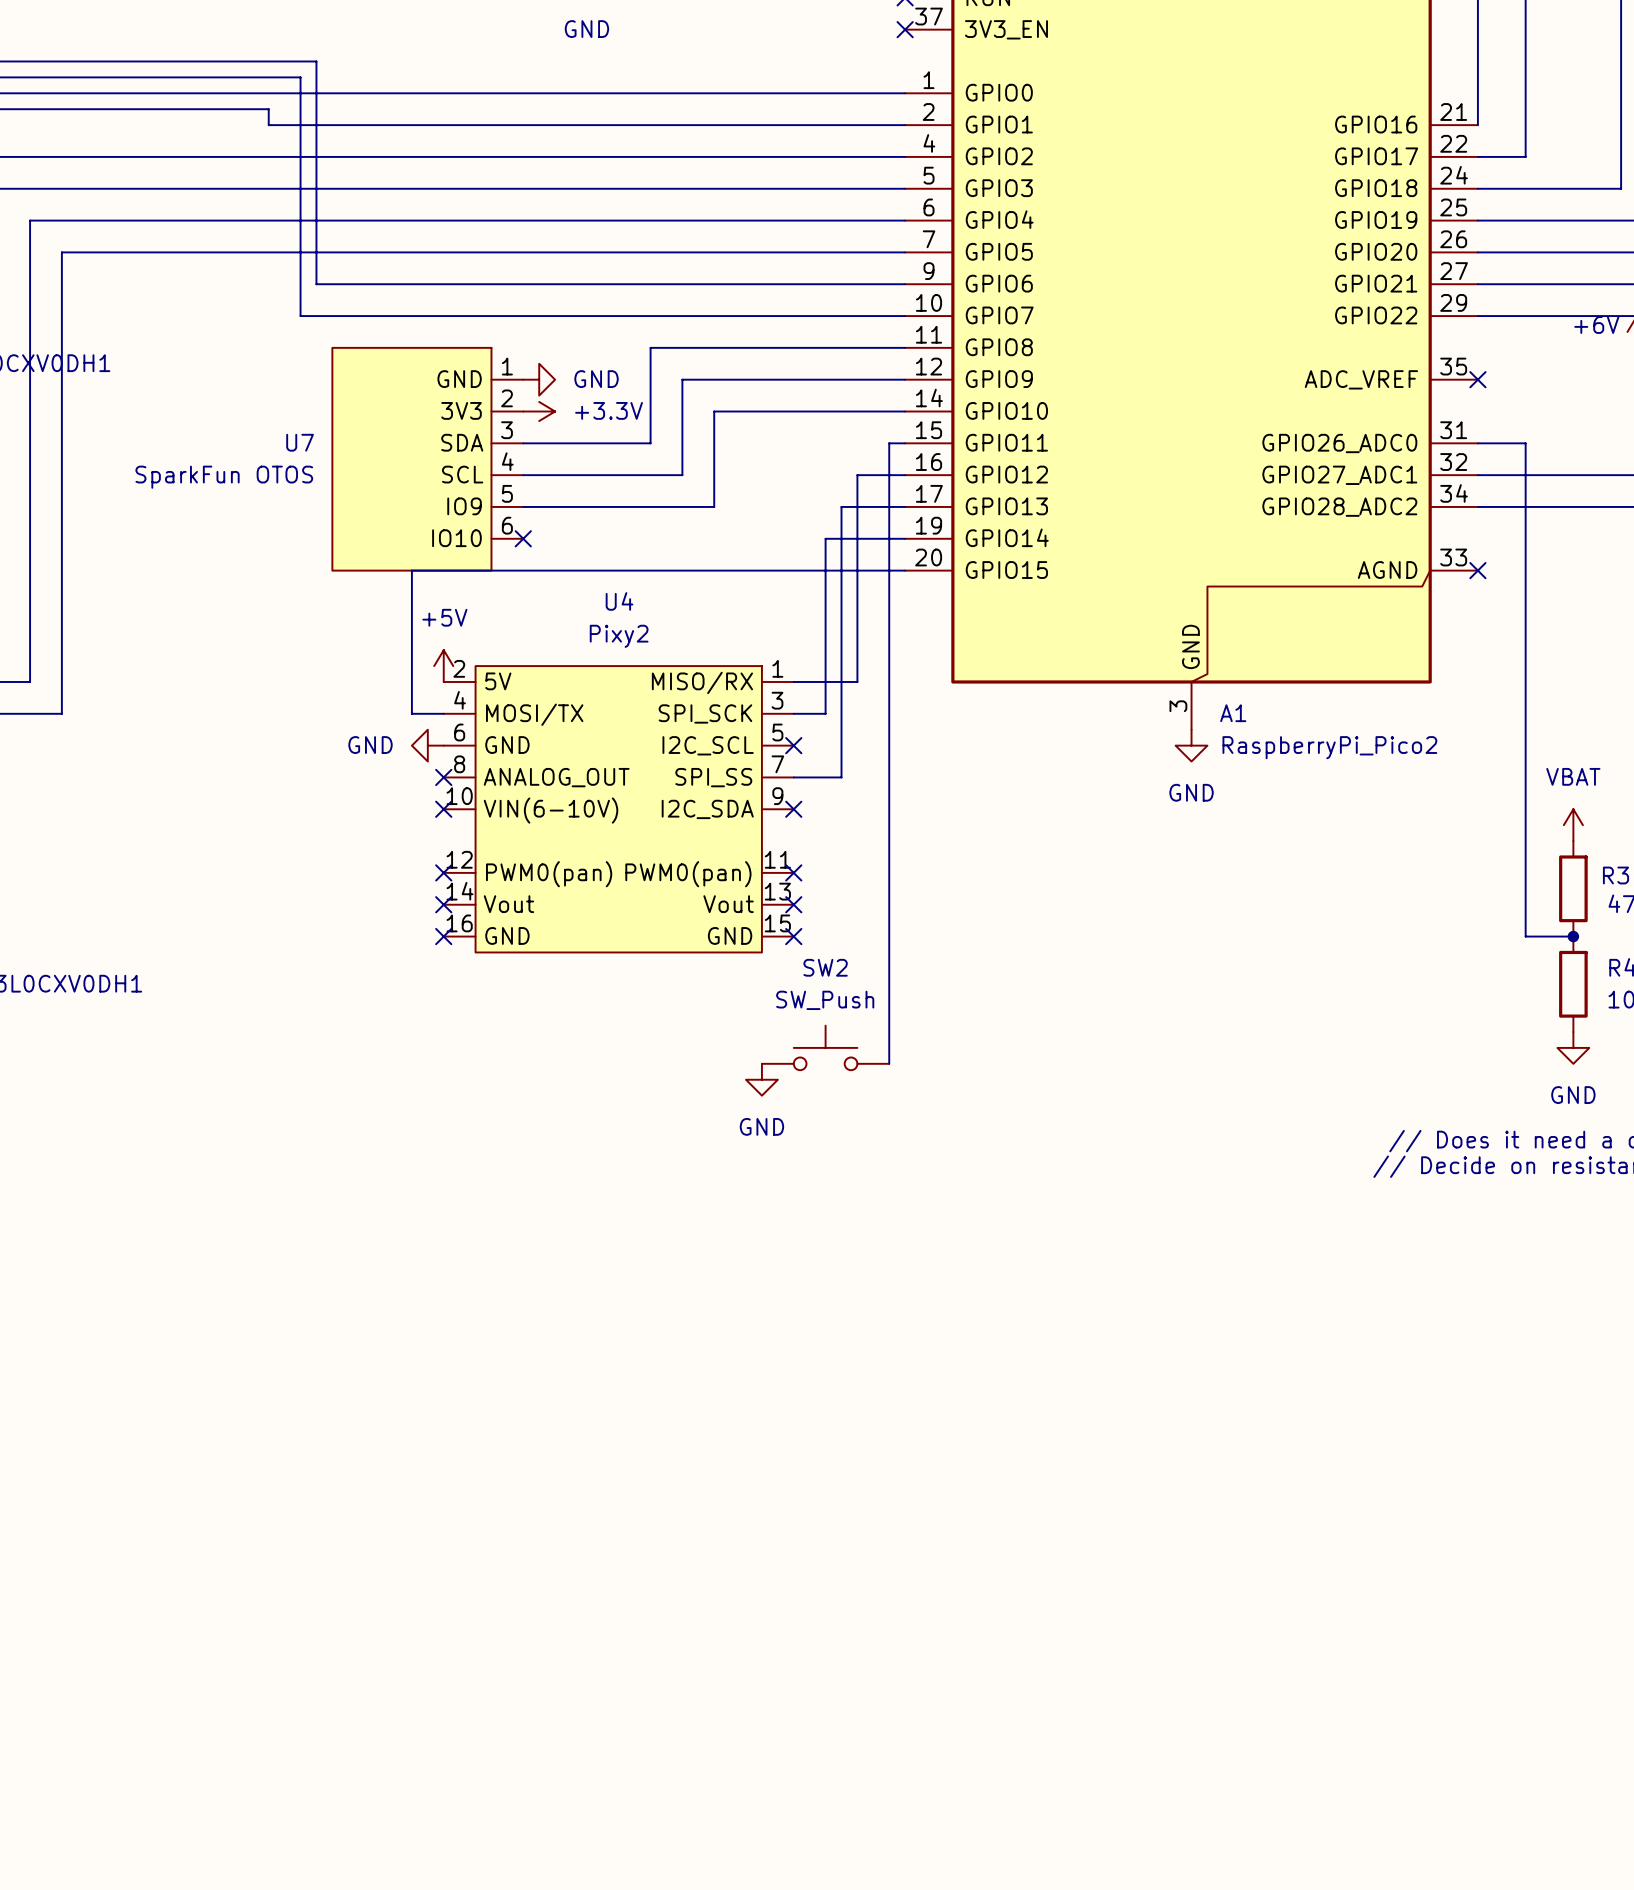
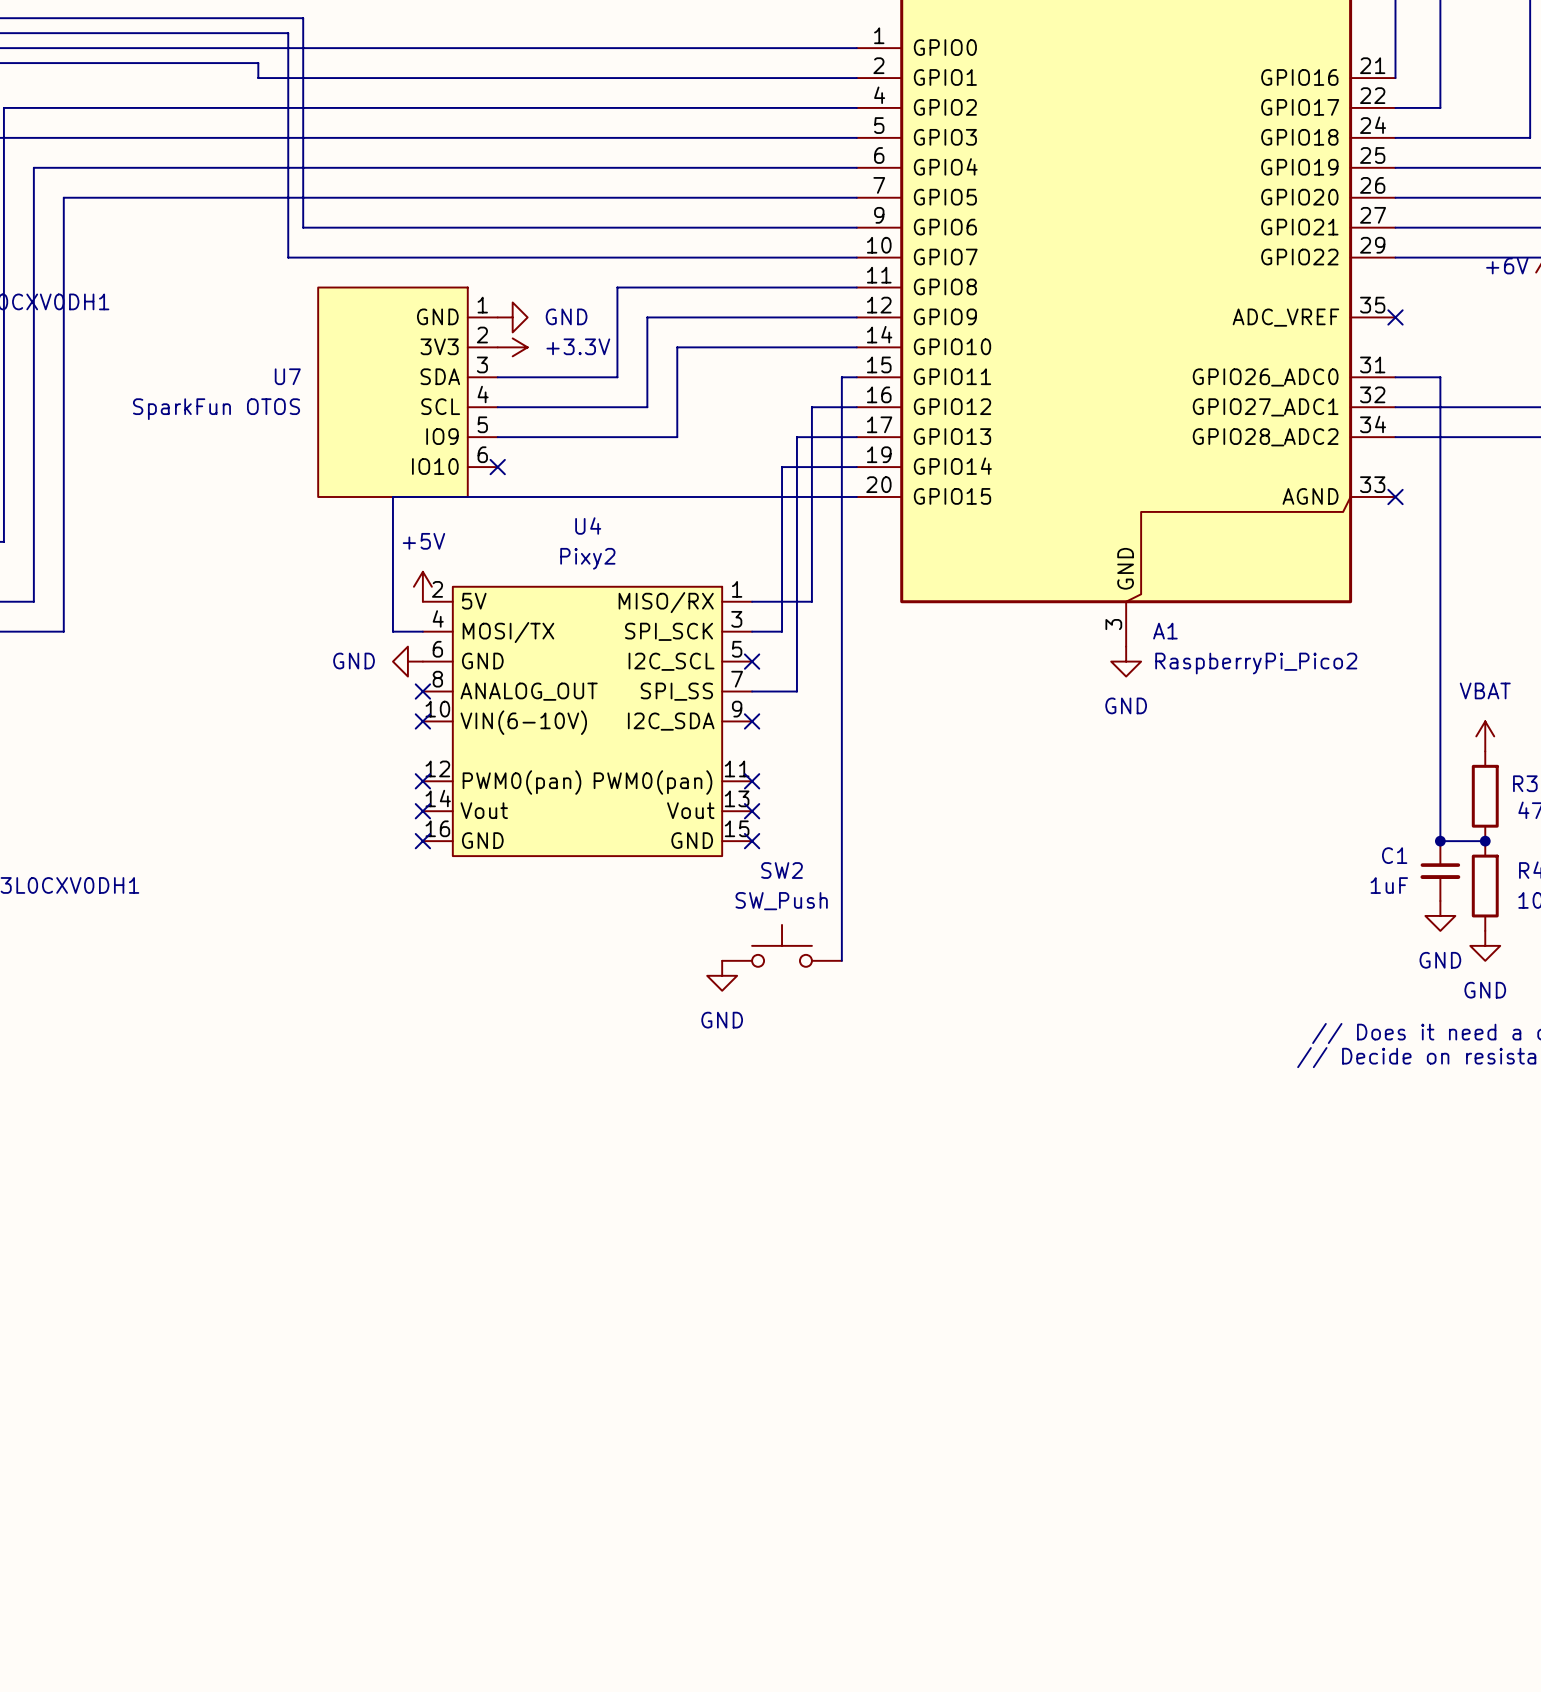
junction: none -> (1440, 841)
C1: none -> 1uF (1440, 871)
power symbol: none -> GND (1440, 915)

